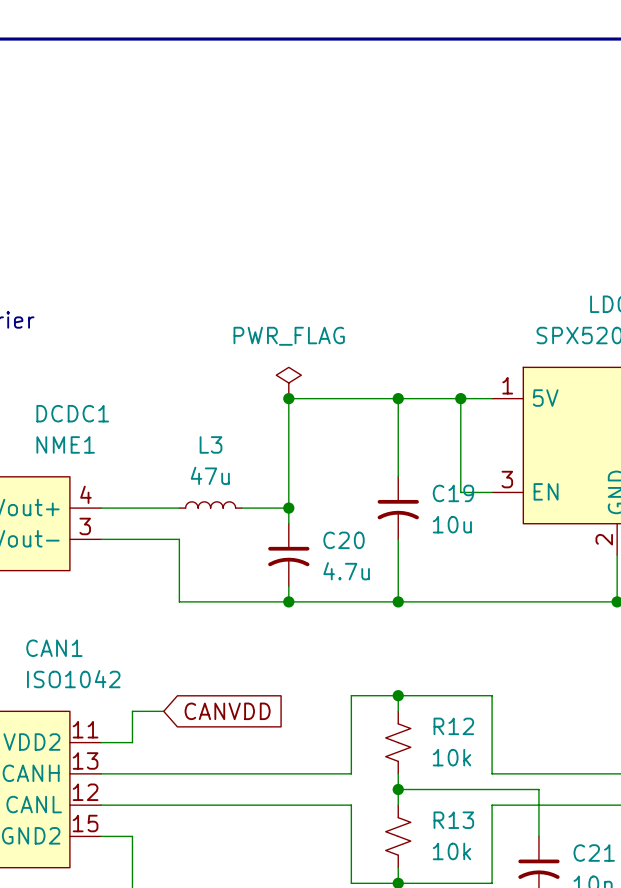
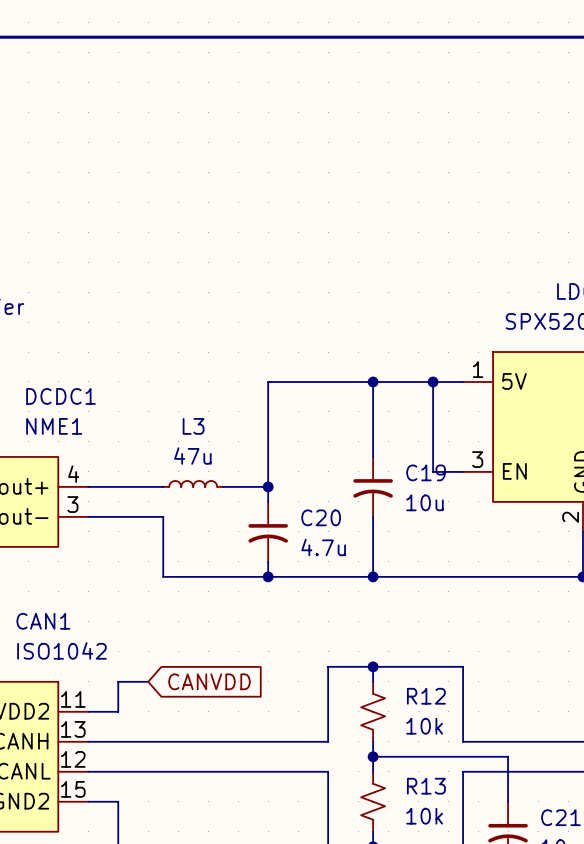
power symbol: PWR_FLAG (288, 383) -> none
junction: (288, 398) -> none

